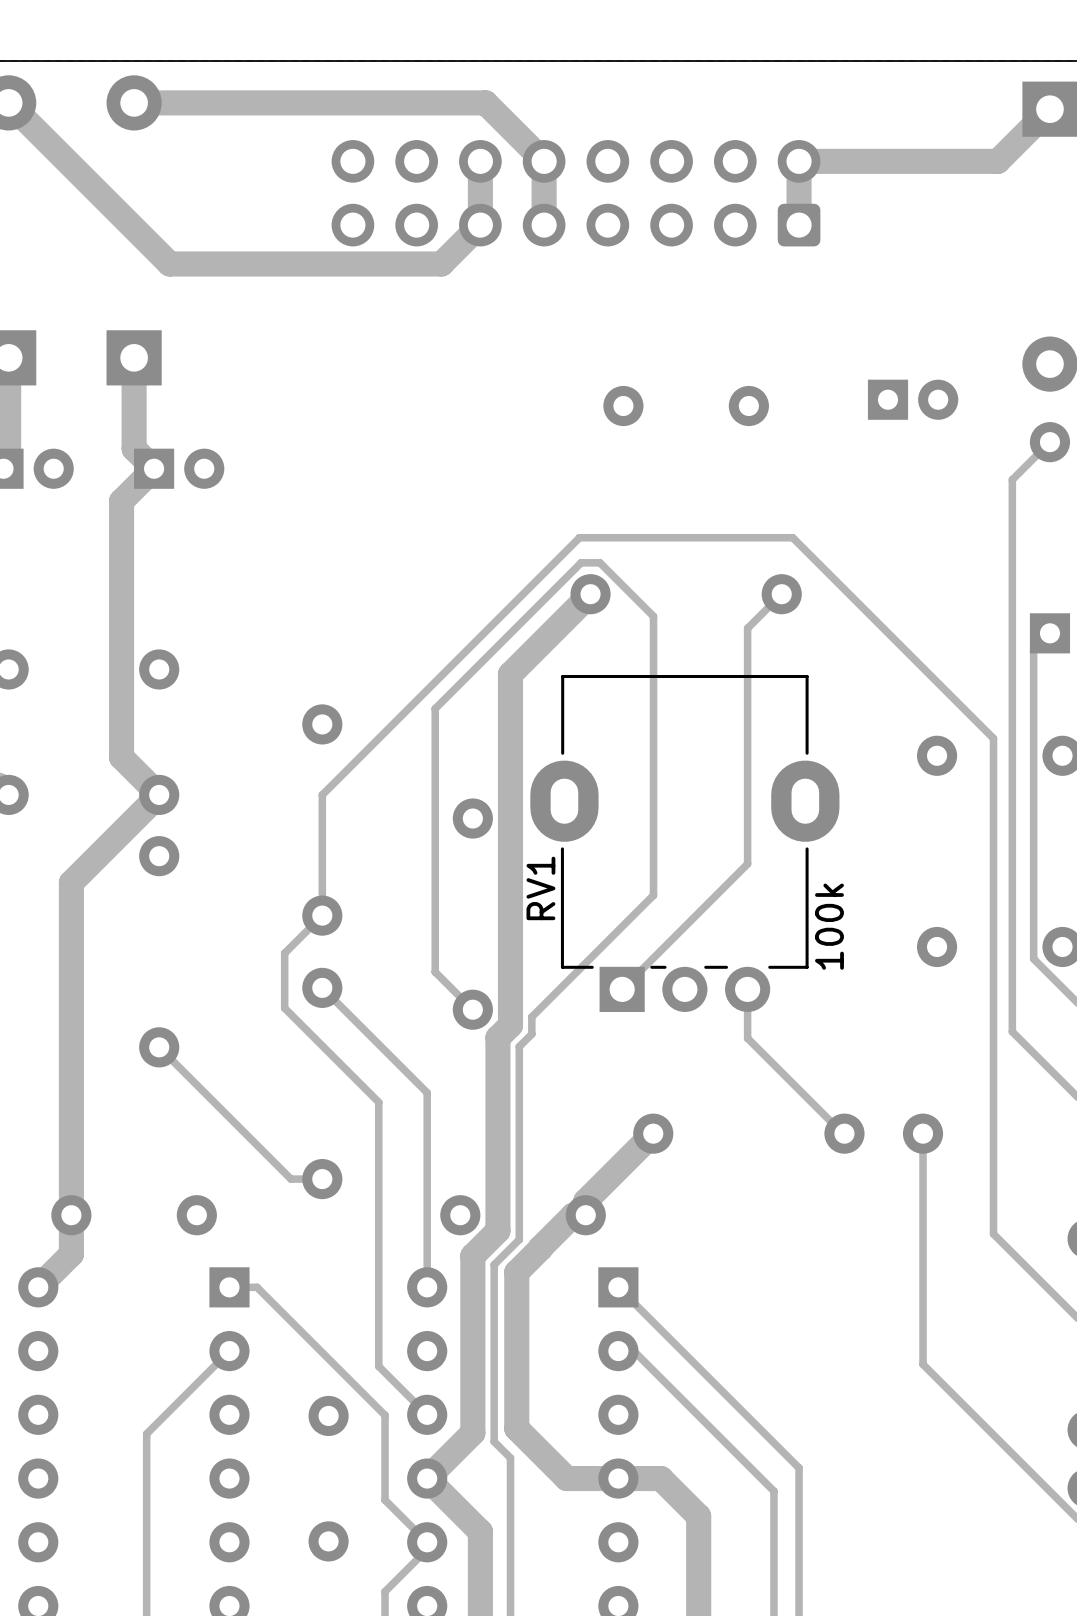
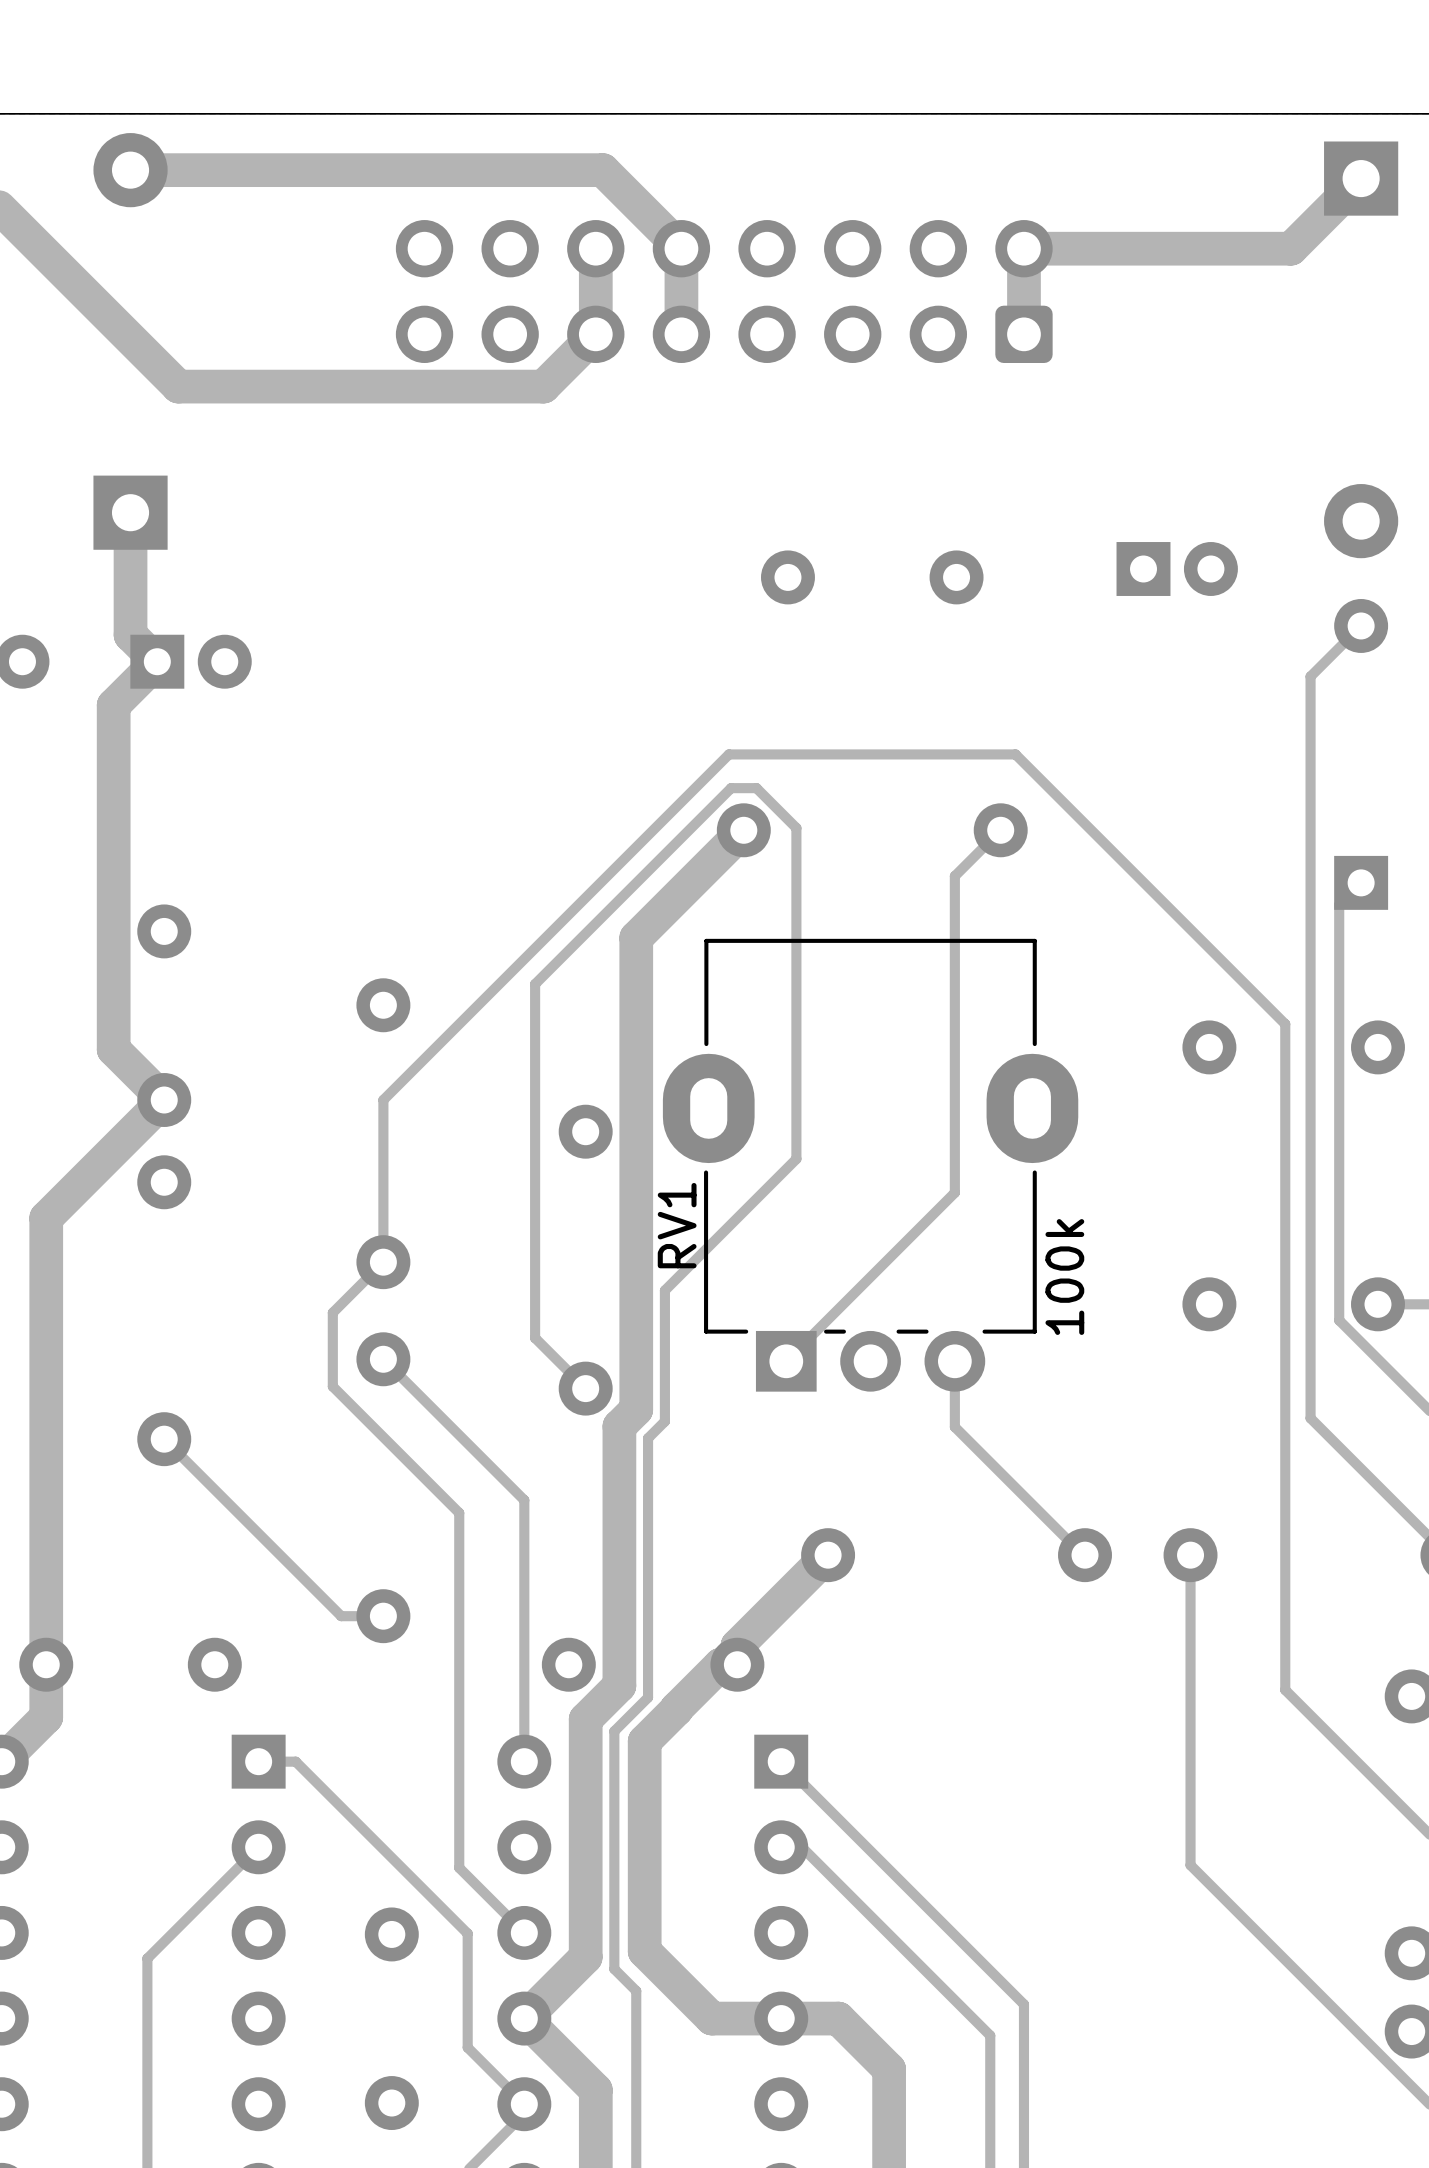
track: (629, 592) (653, 616) (653, 895) (531, 1016) -> (796, 828) (796, 1159) (664, 1290) (664, 1398)

